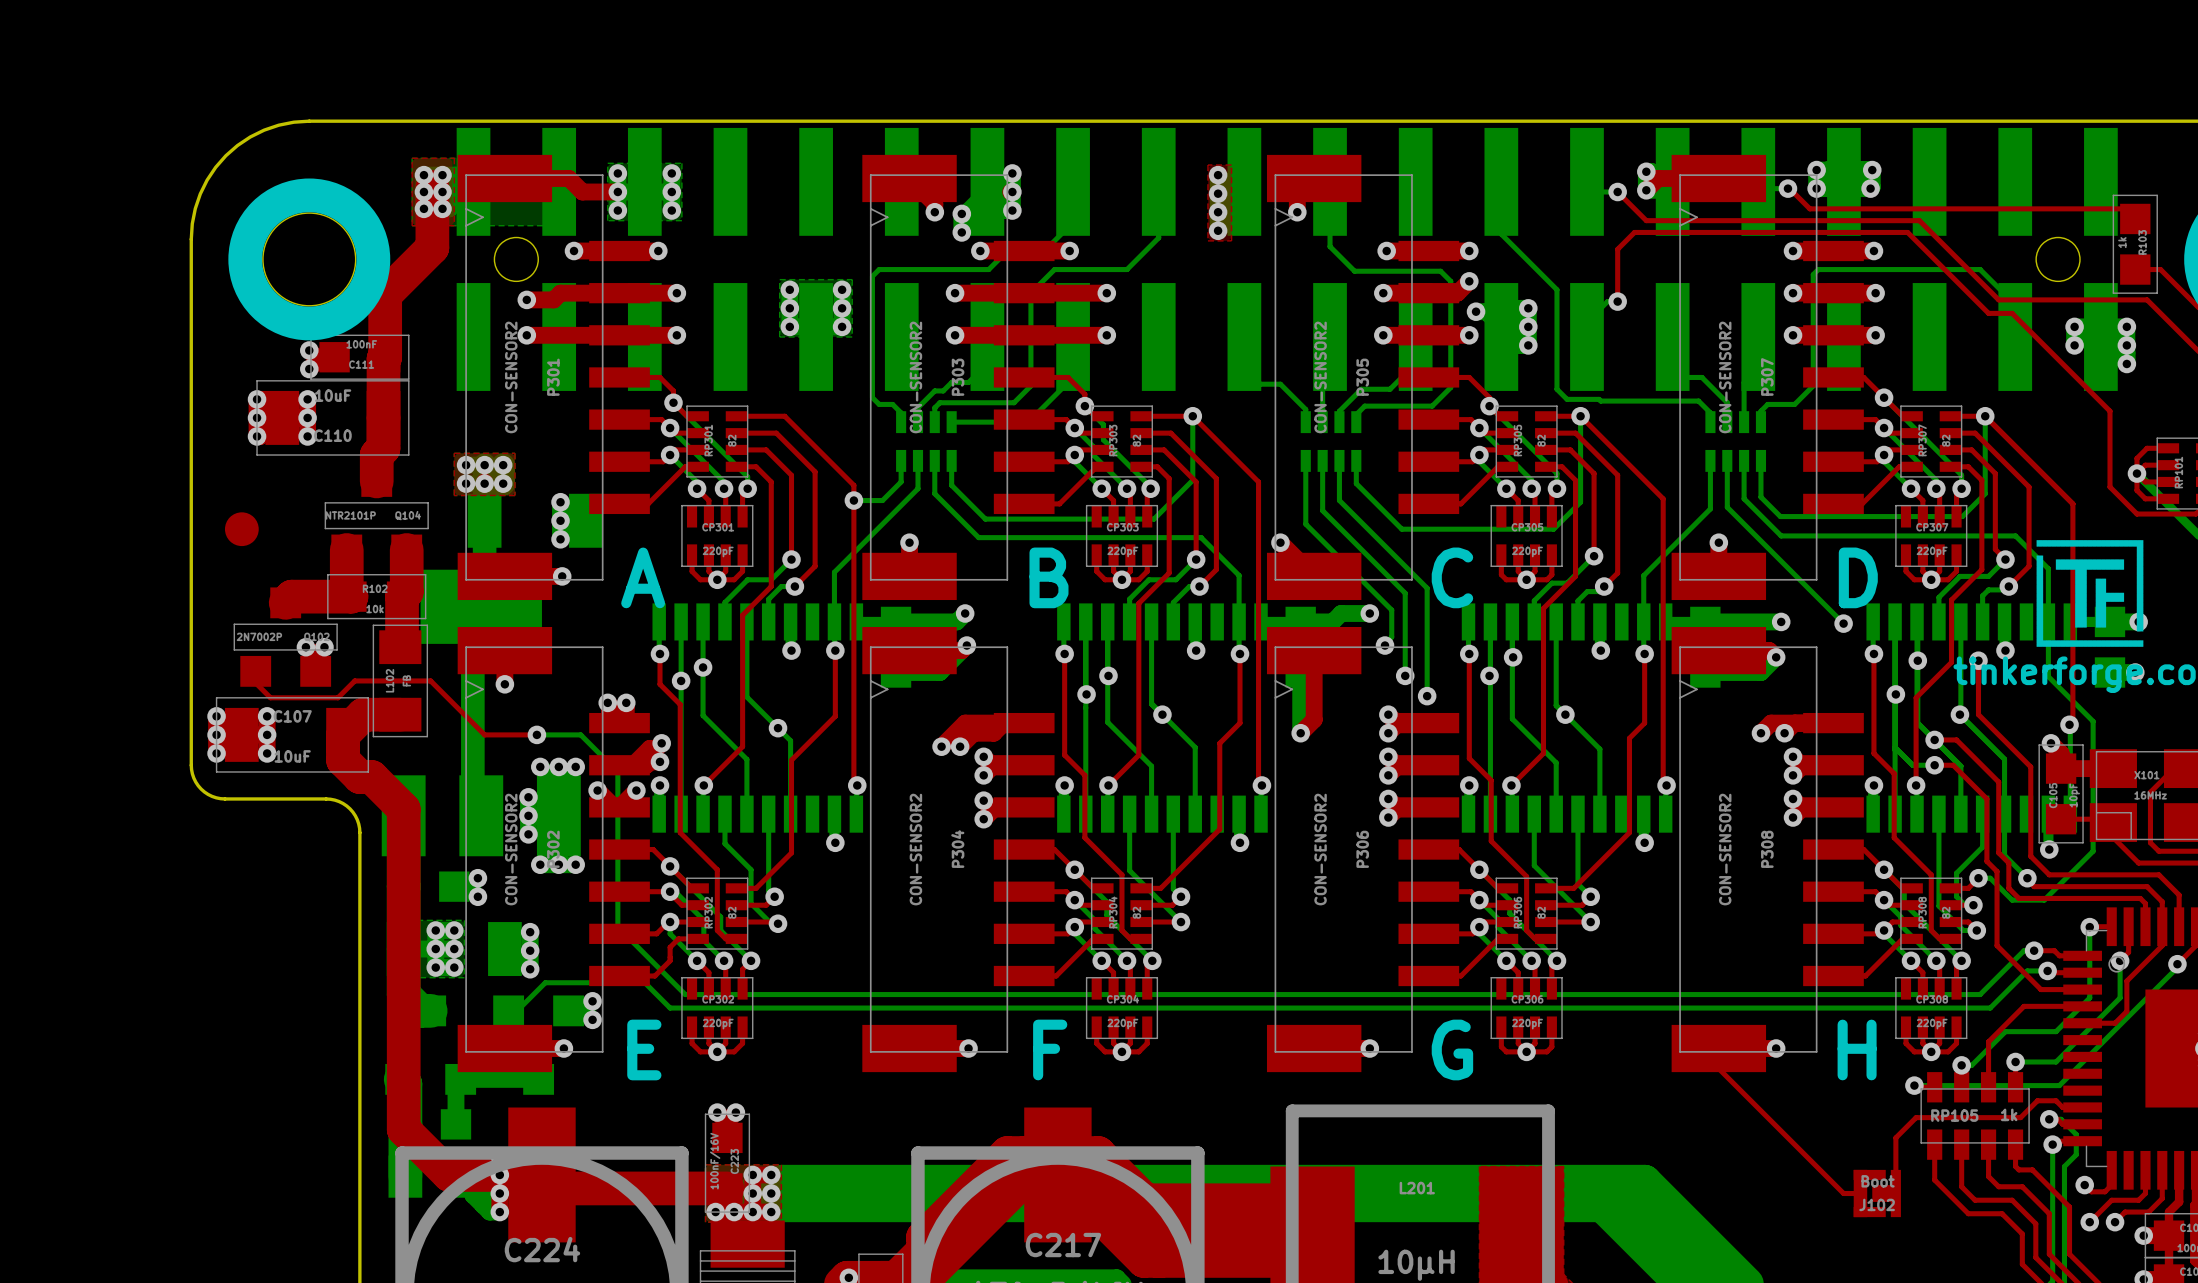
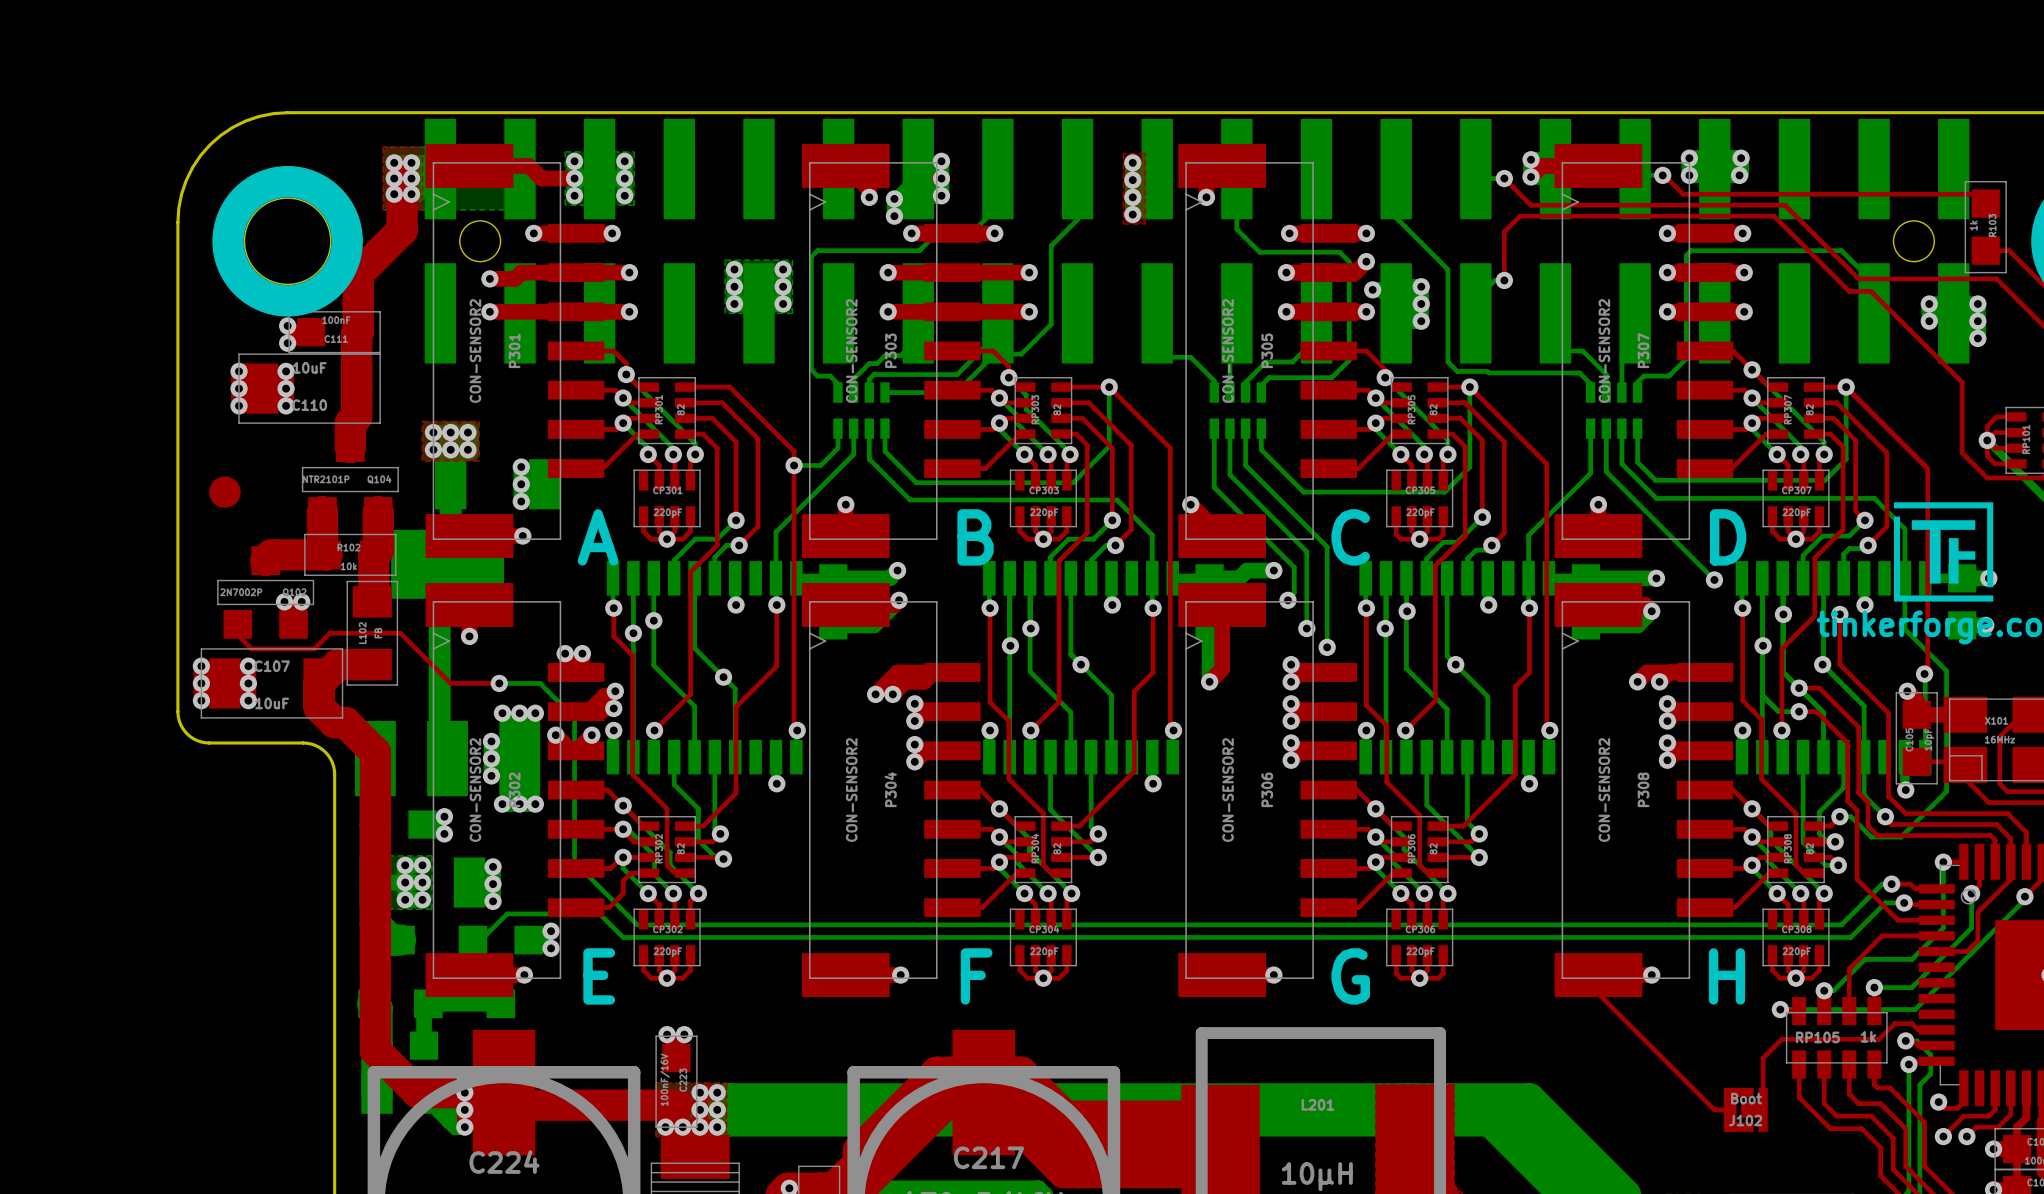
bottom track: (1158, 236) (1127, 269) (1054, 269) (1030, 293) (1030, 385) (1014, 402) -> (1077, 219) (1051, 245) (1051, 324) (1021, 354) (994, 354)
bottom track: none -> (997, 333) (957, 374) (943, 374)

